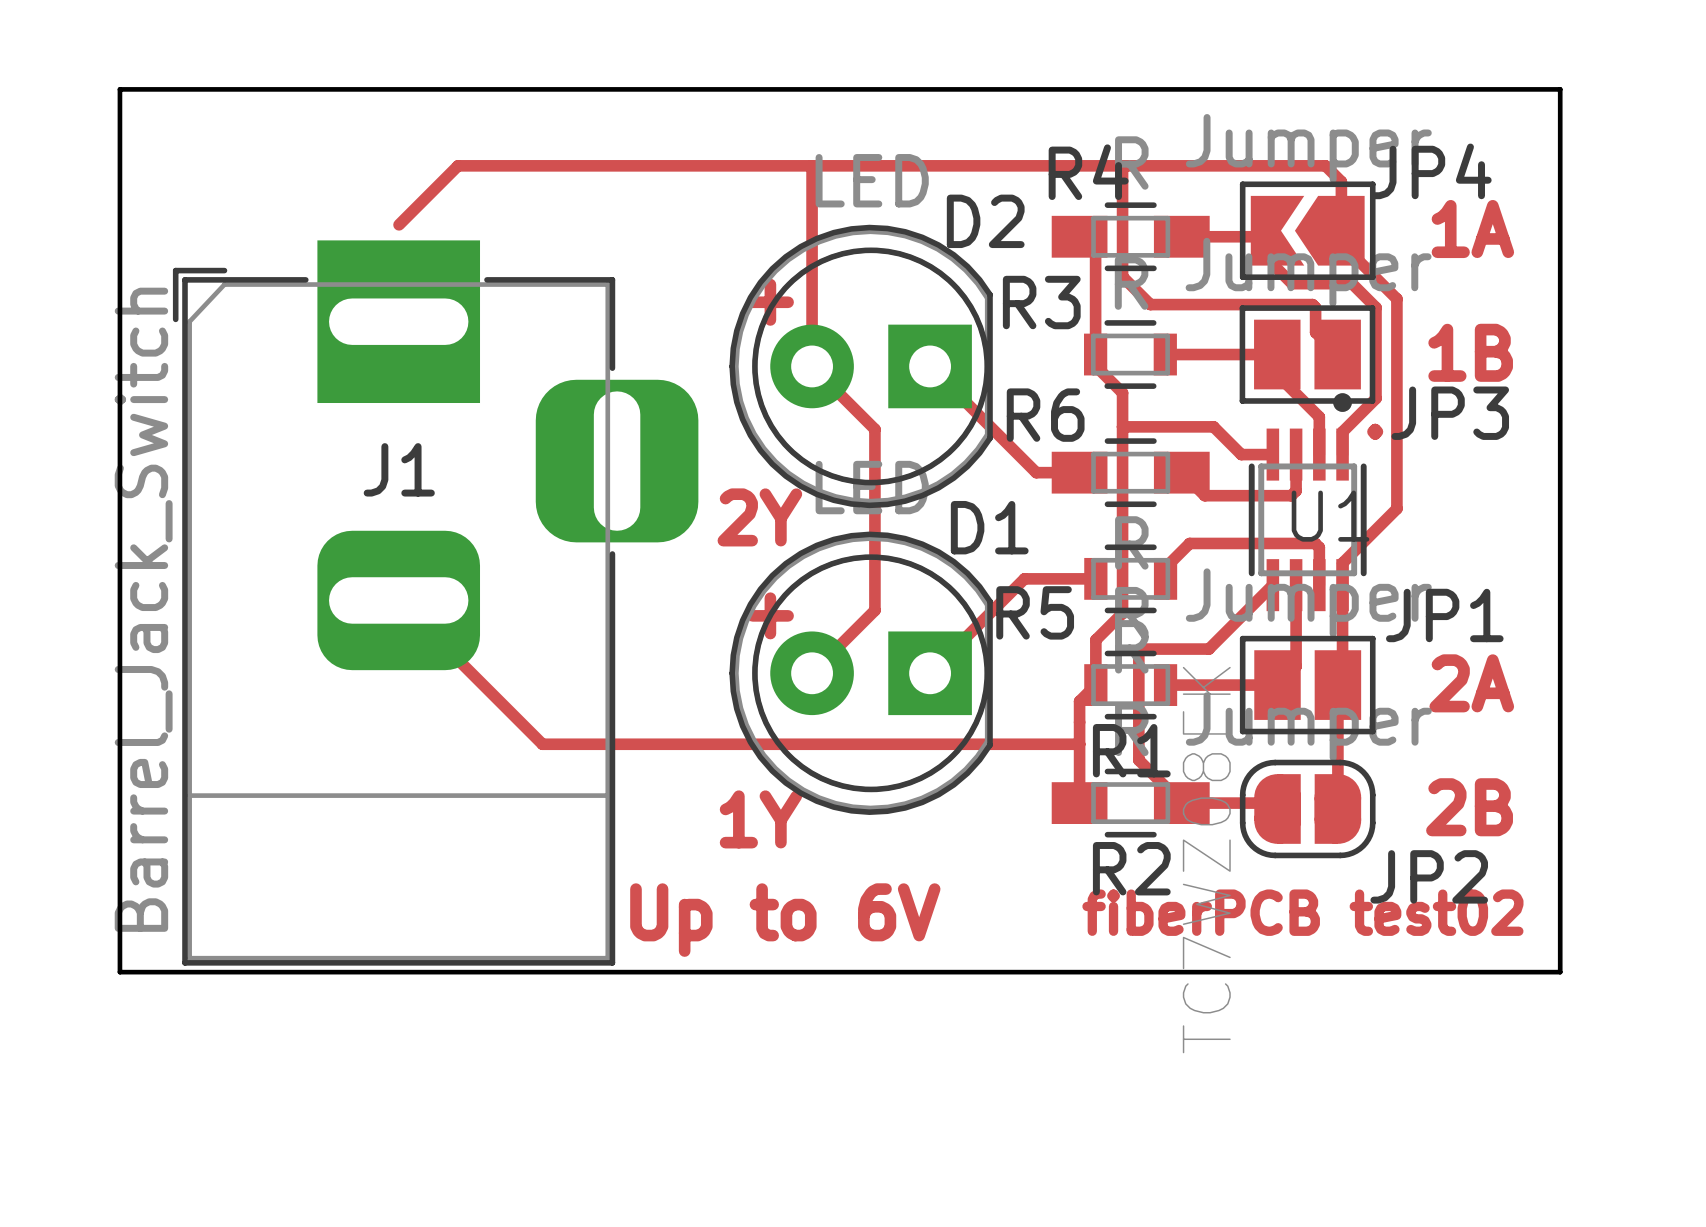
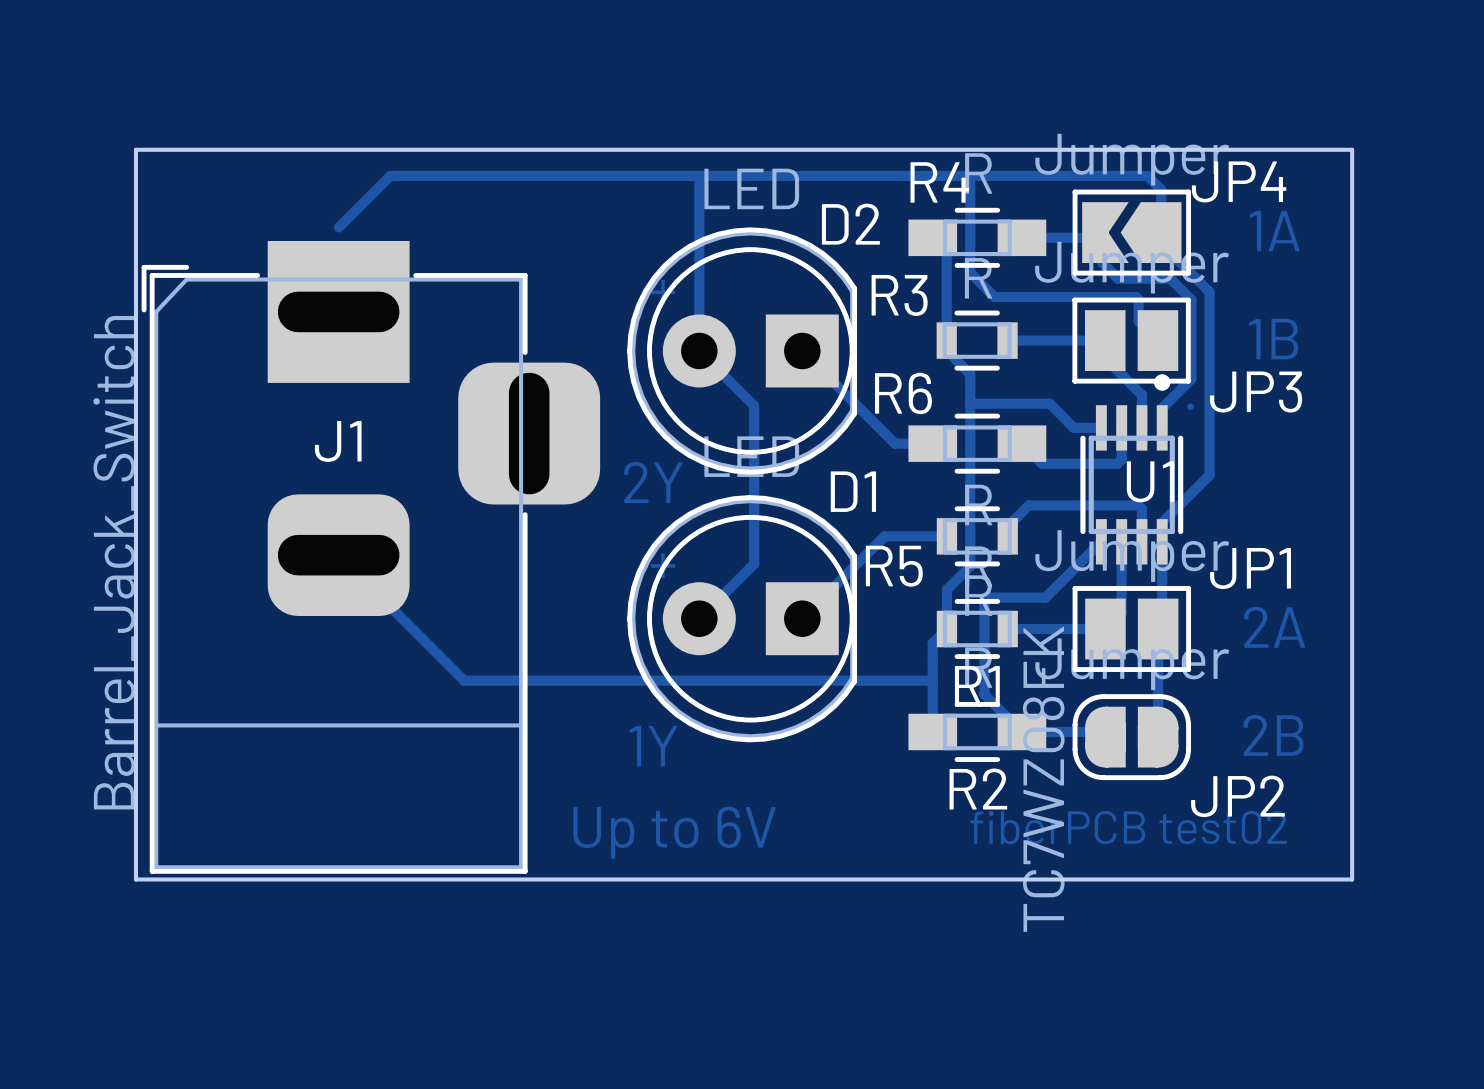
board edge: (1560, 135) (1560, 89) (119, 89) (119, 972) (166, 972) -> (1352, 149) (135, 149) (135, 879)

